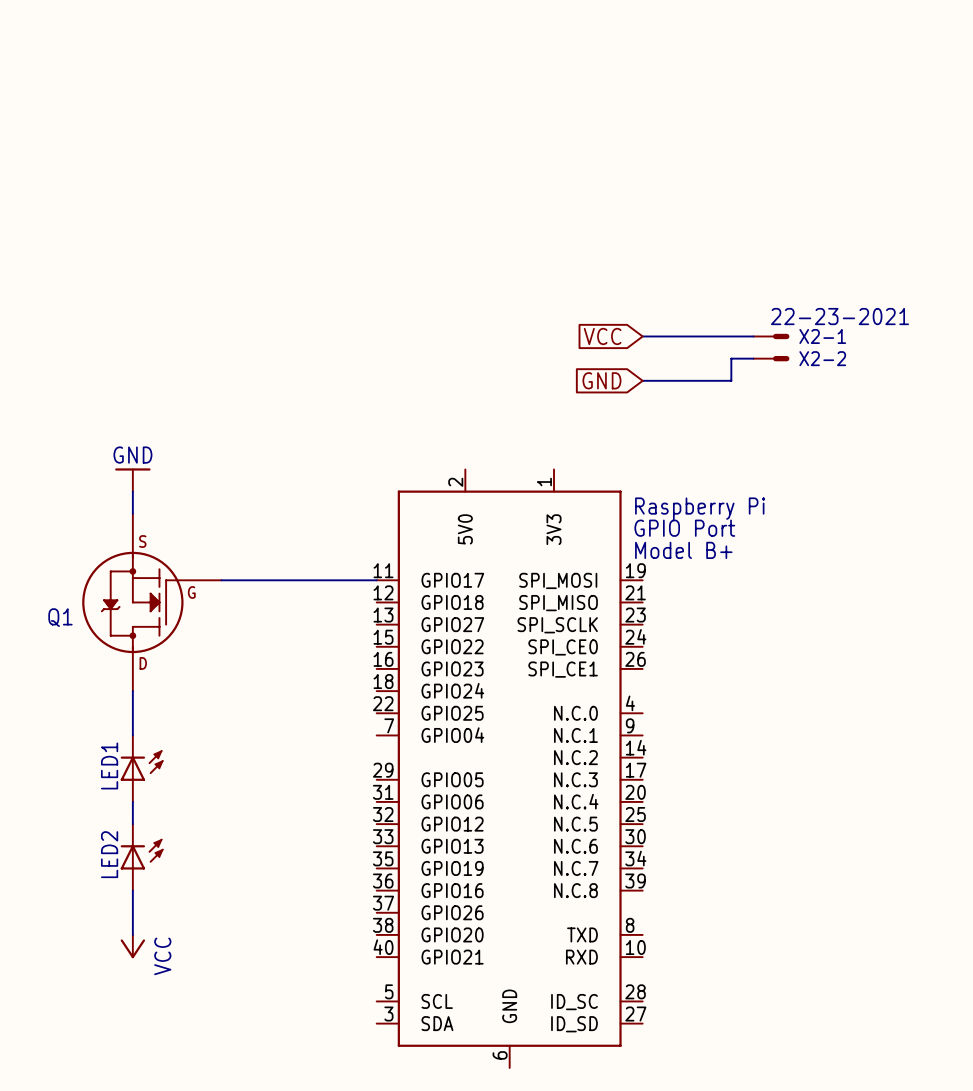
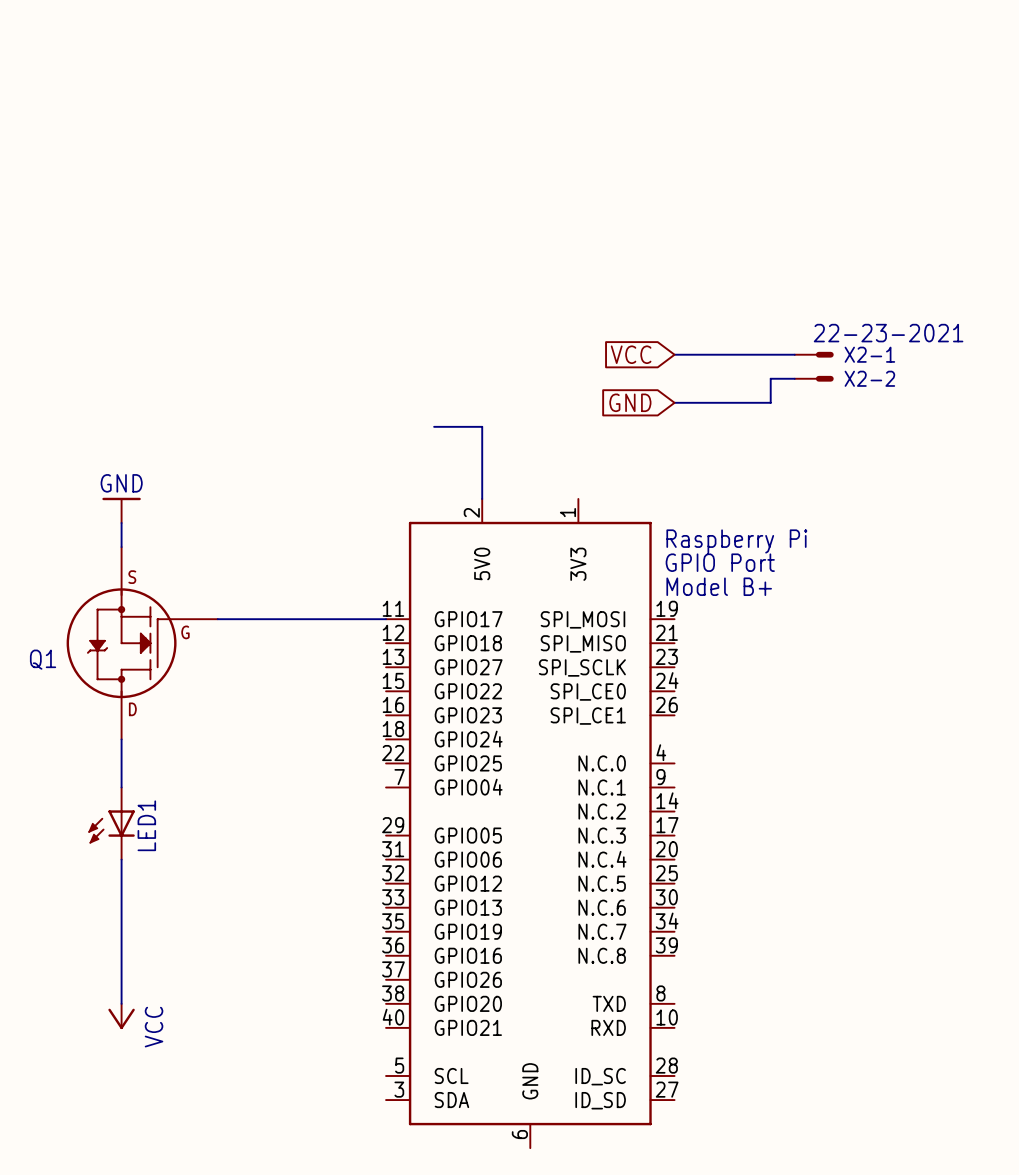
wire: none -> (434, 426) (482, 426) (482, 498)
LED1 rotation: 0° (142, 765) -> 180° (111, 826)
LED2: (142, 857) -> none

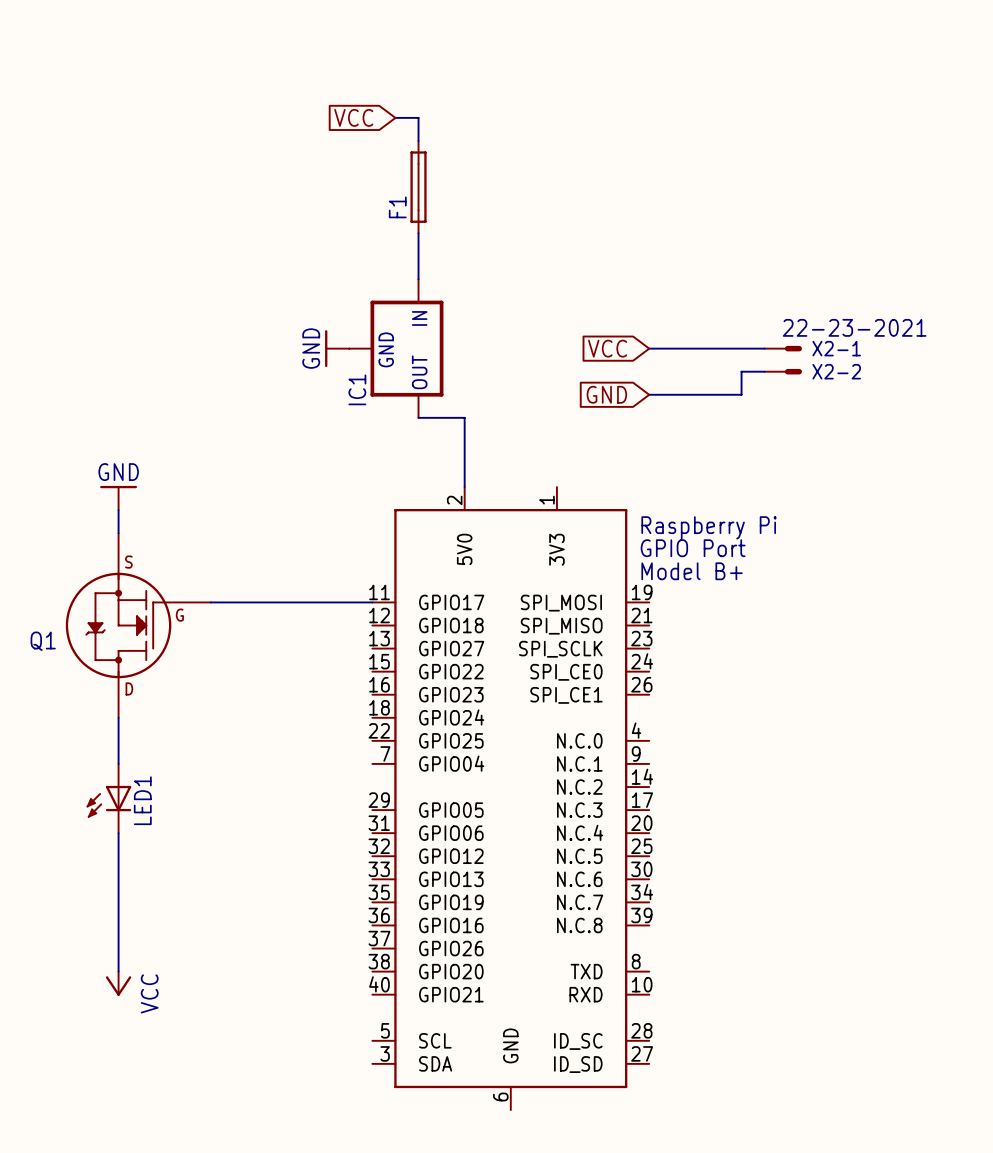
global label: none -> VCC (353, 117)
wire: none -> (395, 117) (418, 117) (418, 140)
F1: none -> (418, 187)
wire: none -> (418, 233) (418, 279)
power symbol: none -> GND (337, 348)
IC1: none -> (396, 348)

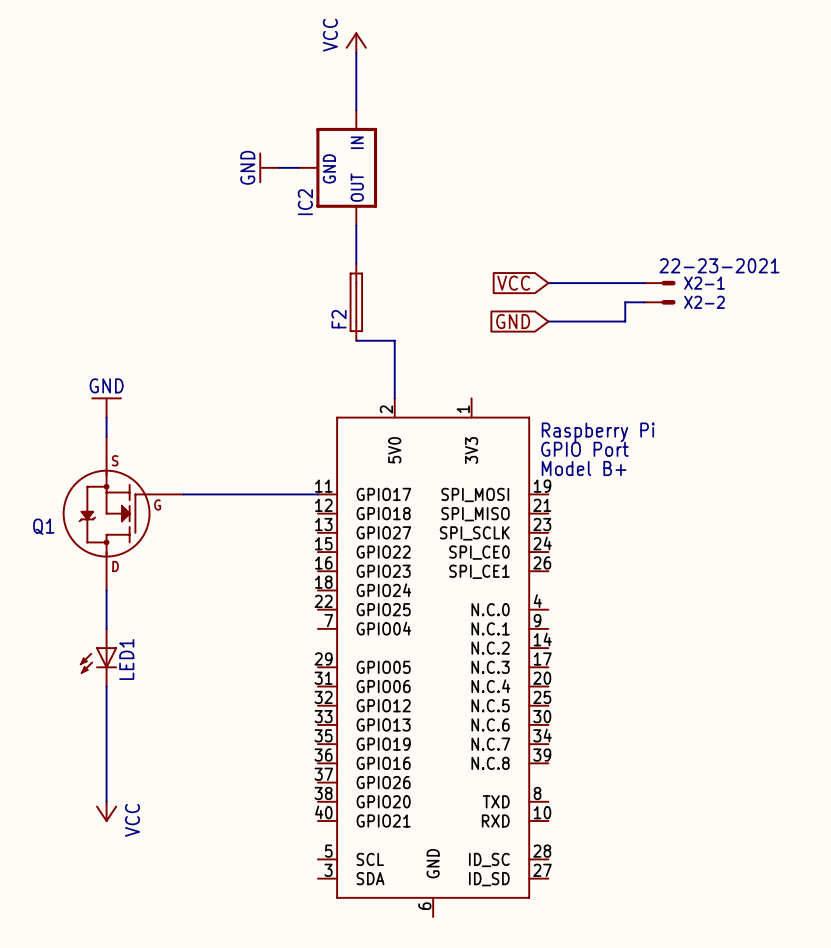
power symbol: none -> VCC (356, 42)
global label: VCC (353, 117) -> none
wire: (395, 117) (418, 117) -> (356, 52) (356, 91)
F1: (418, 187) -> none
wire: none -> (279, 167) (298, 167)
IC2: none -> (337, 167)
power symbol position: GND (337, 348) -> GND (269, 167)
IC1: (396, 348) -> none
F2: none -> (356, 302)

